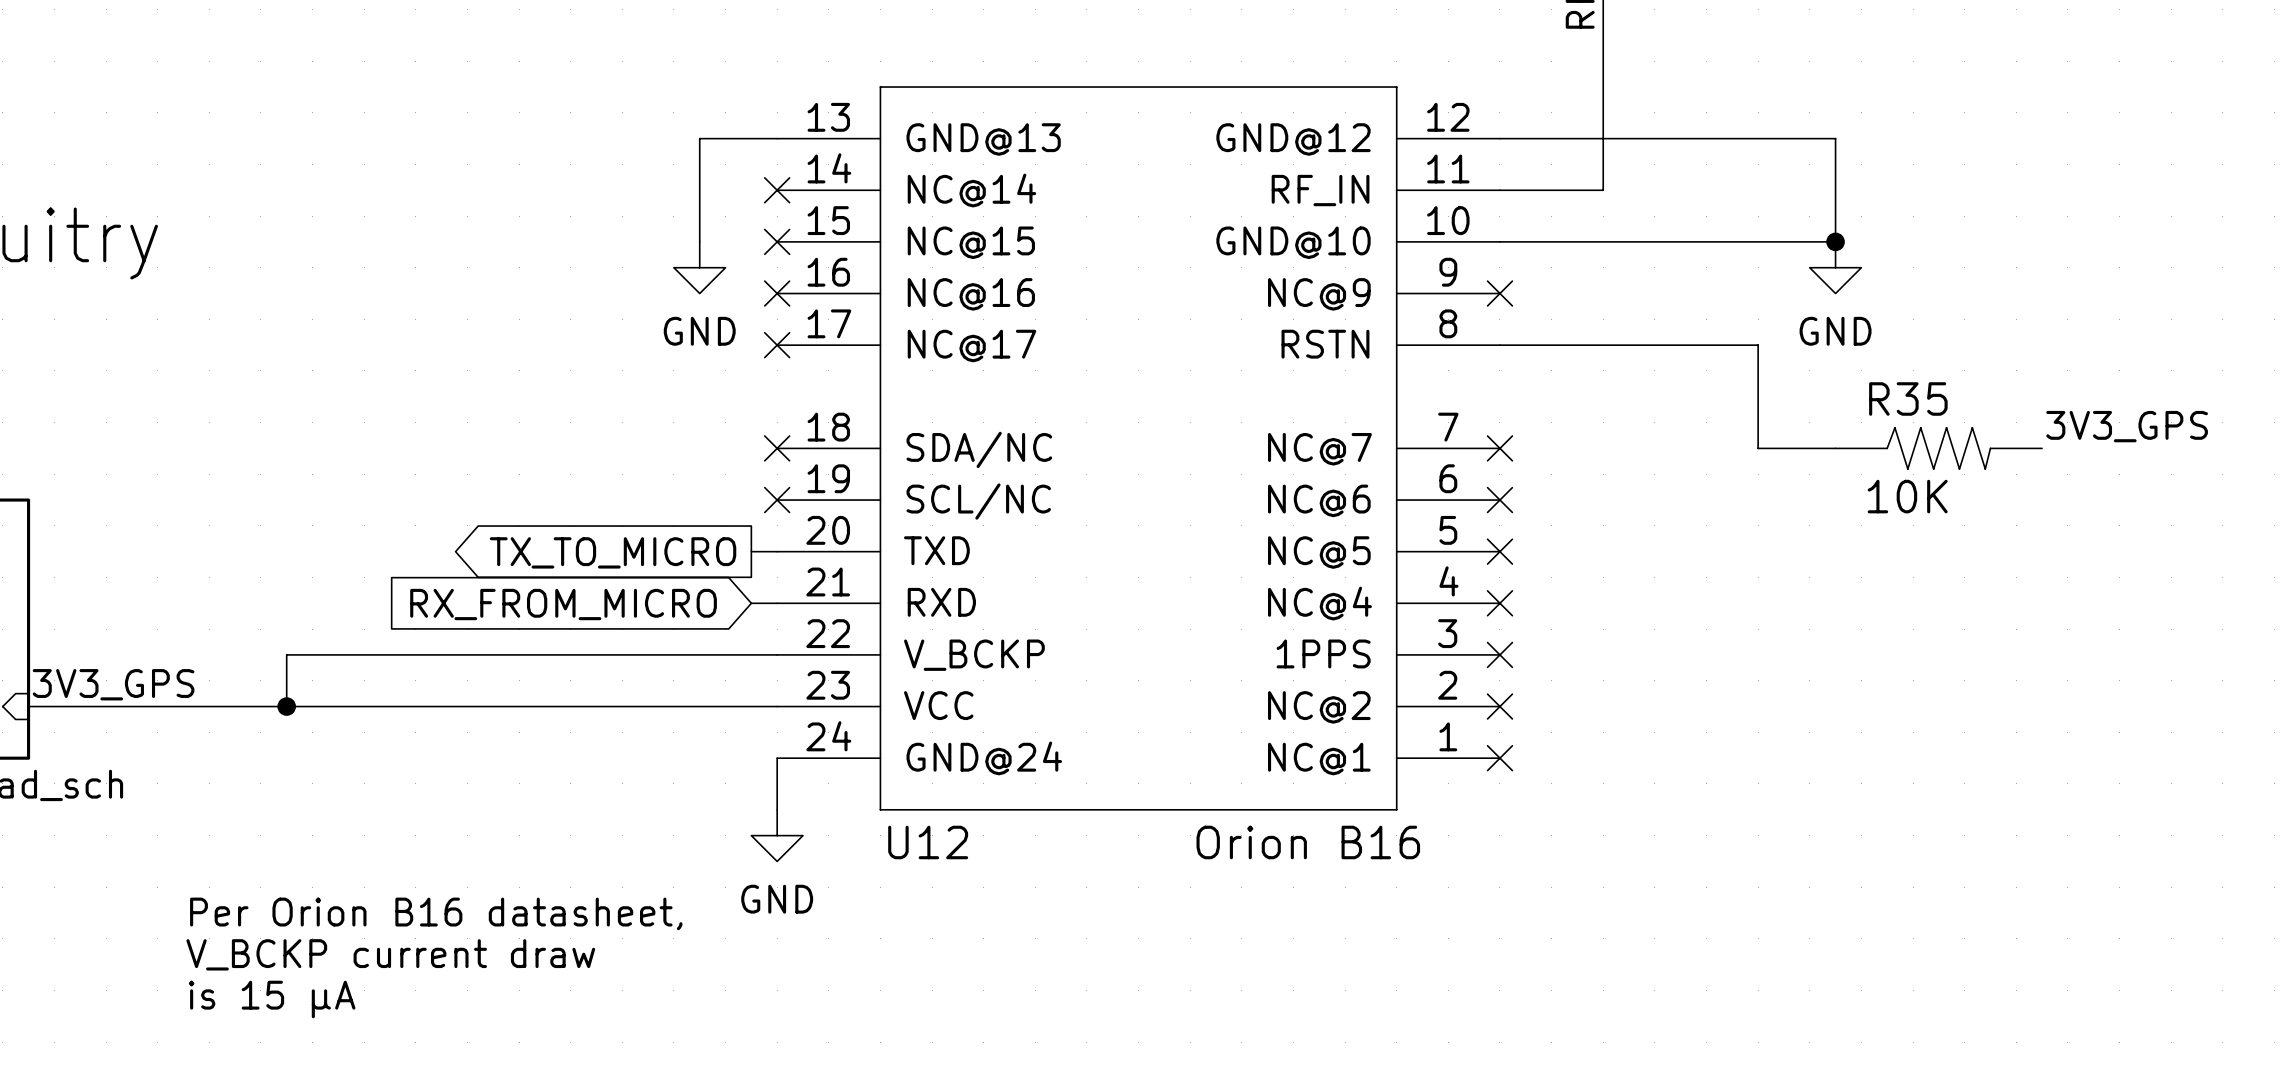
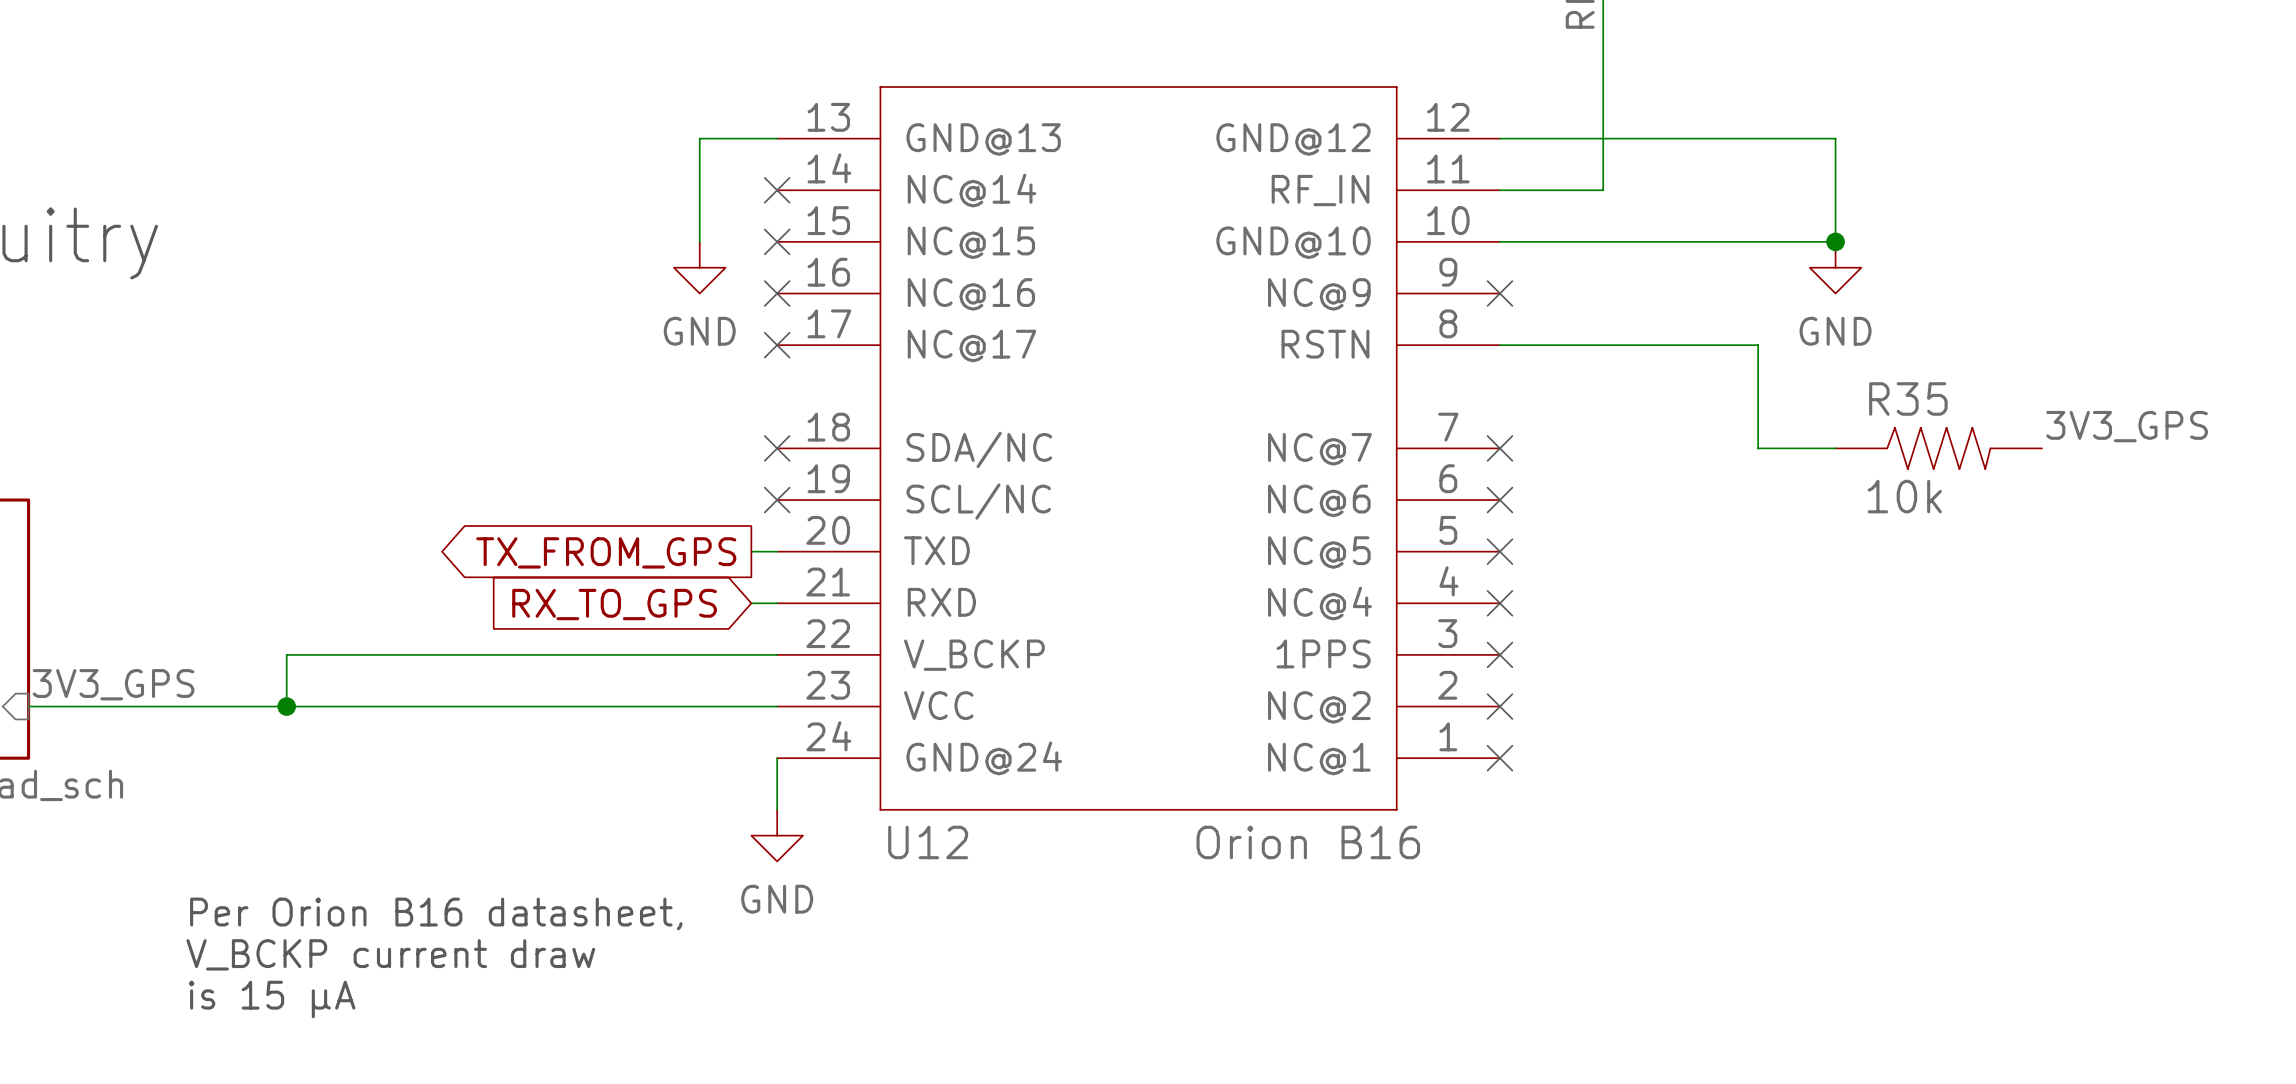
R35 value: 10K (1907, 496) -> 10k (1904, 496)
global label: TX_TO_MICRO (613, 552) -> TX_FROM_GPS (606, 552)
global label: RX_FROM_MICRO (563, 604) -> RX_TO_GPS (614, 604)

